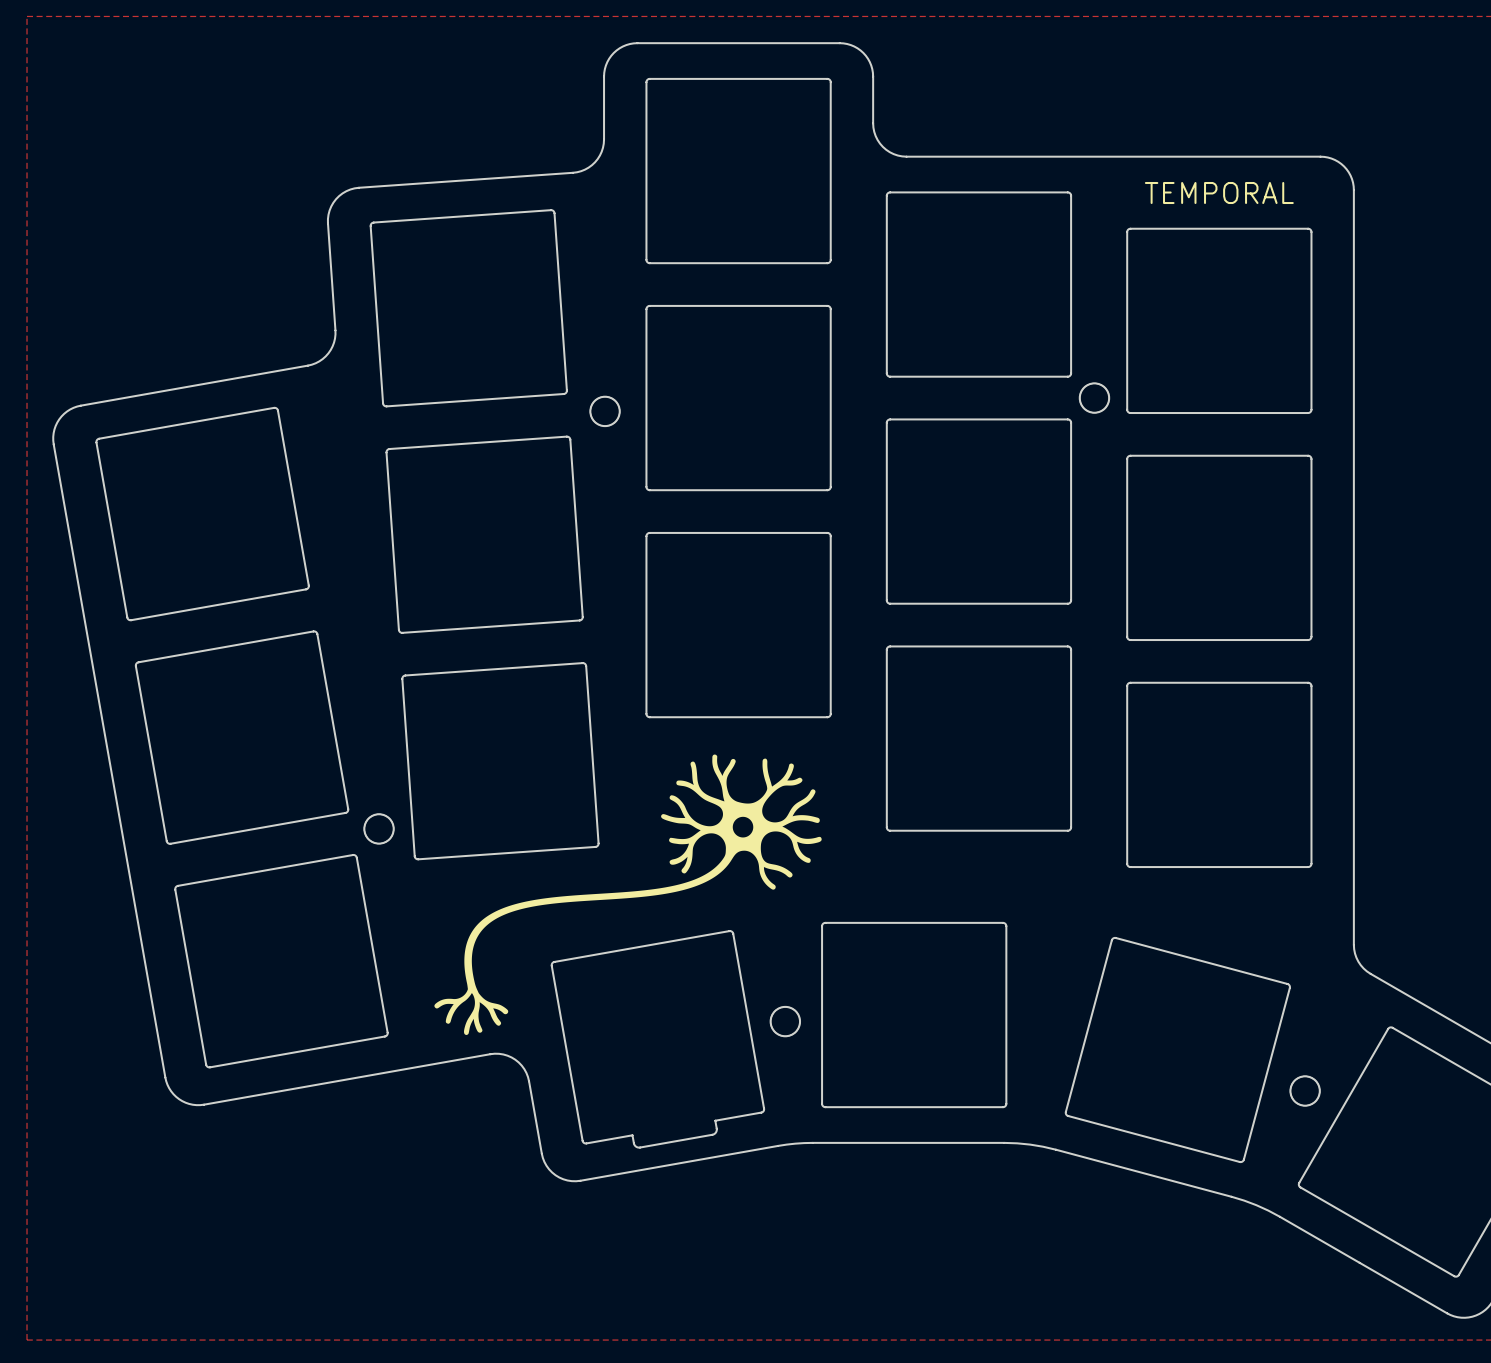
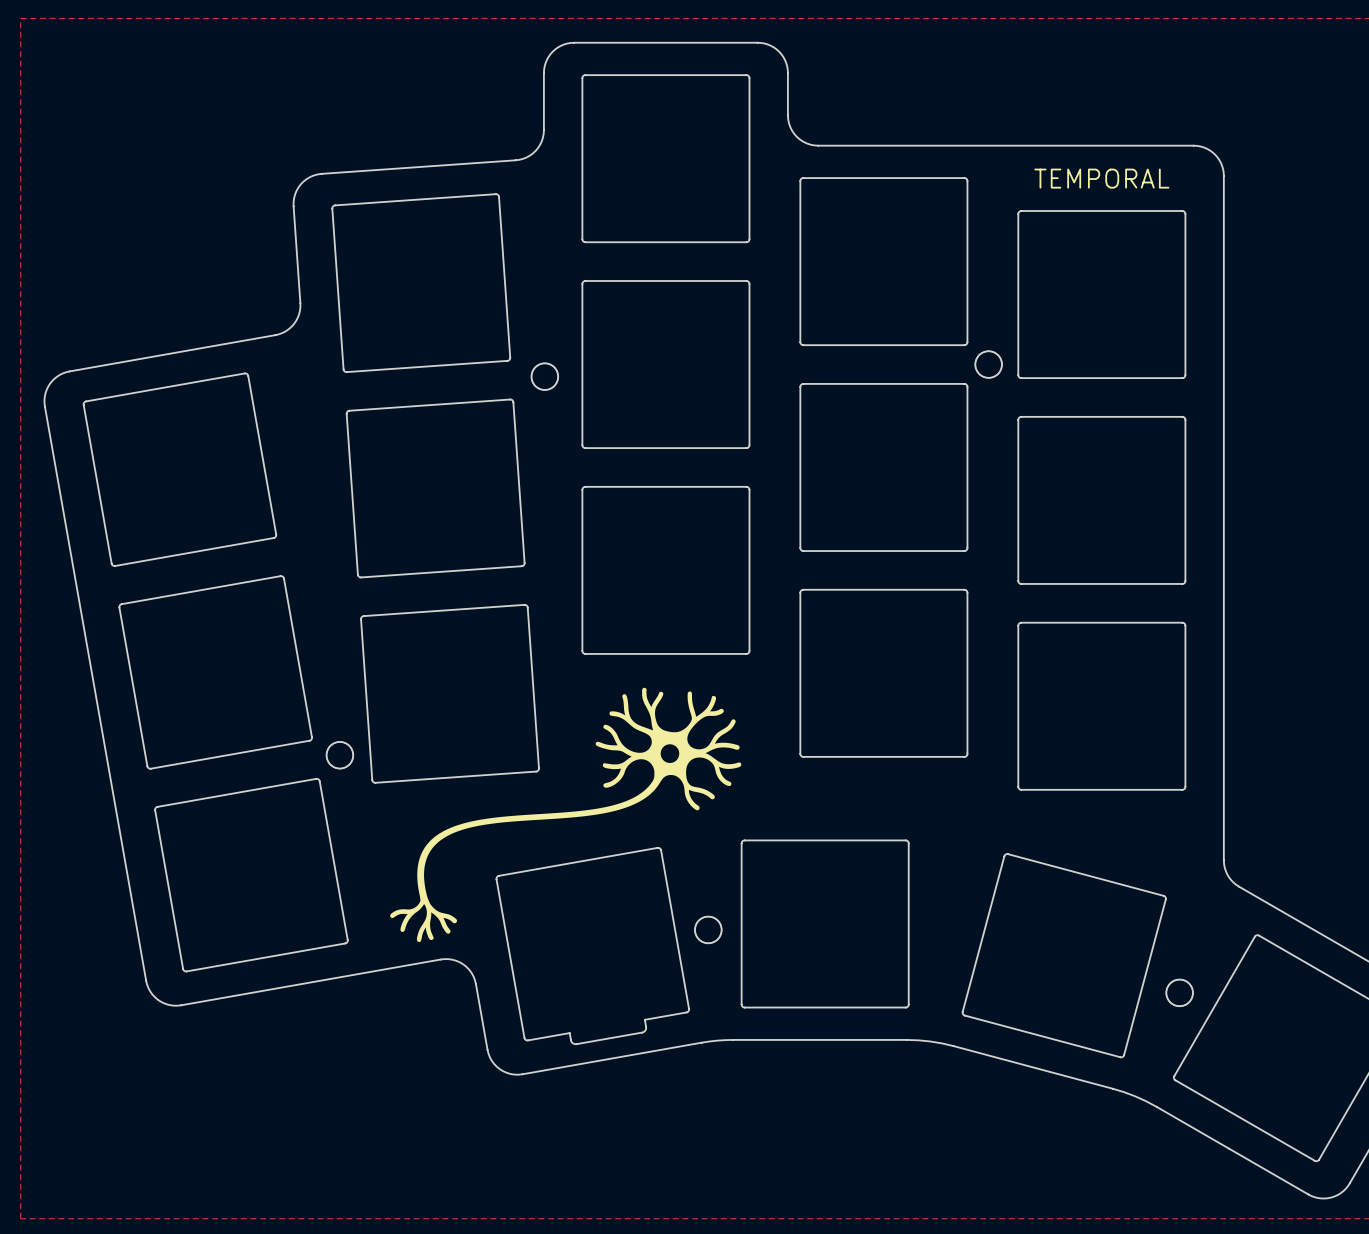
drawing shape: [434, 754, 822, 1035] -> [390, 687, 742, 943]

